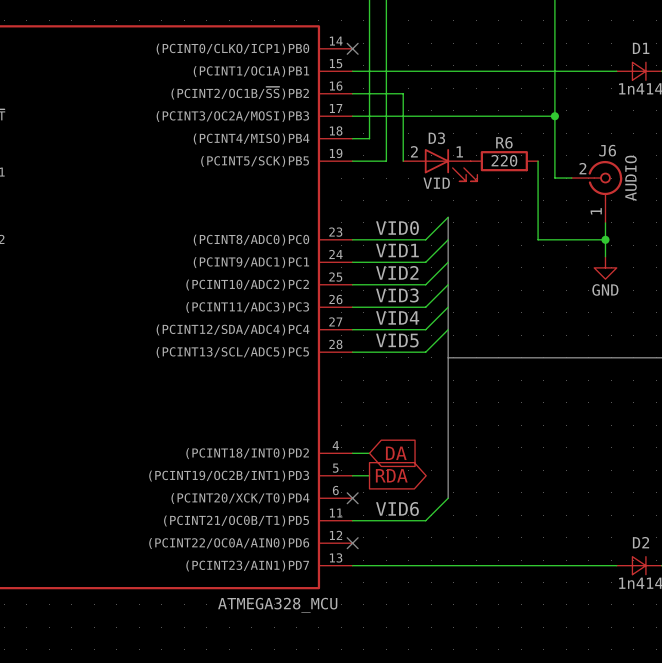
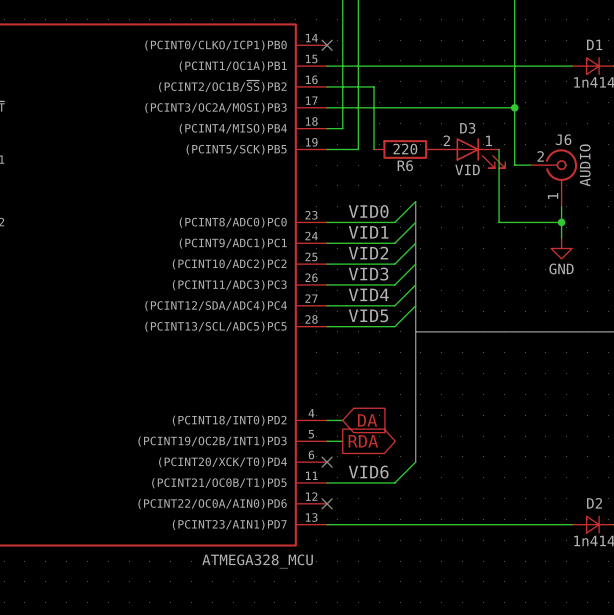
R6 name position: R6 (504, 142) -> R6 (405, 165)
R6 position: (504, 161) -> (405, 149)
D3 position: (440, 165) -> (470, 153)

